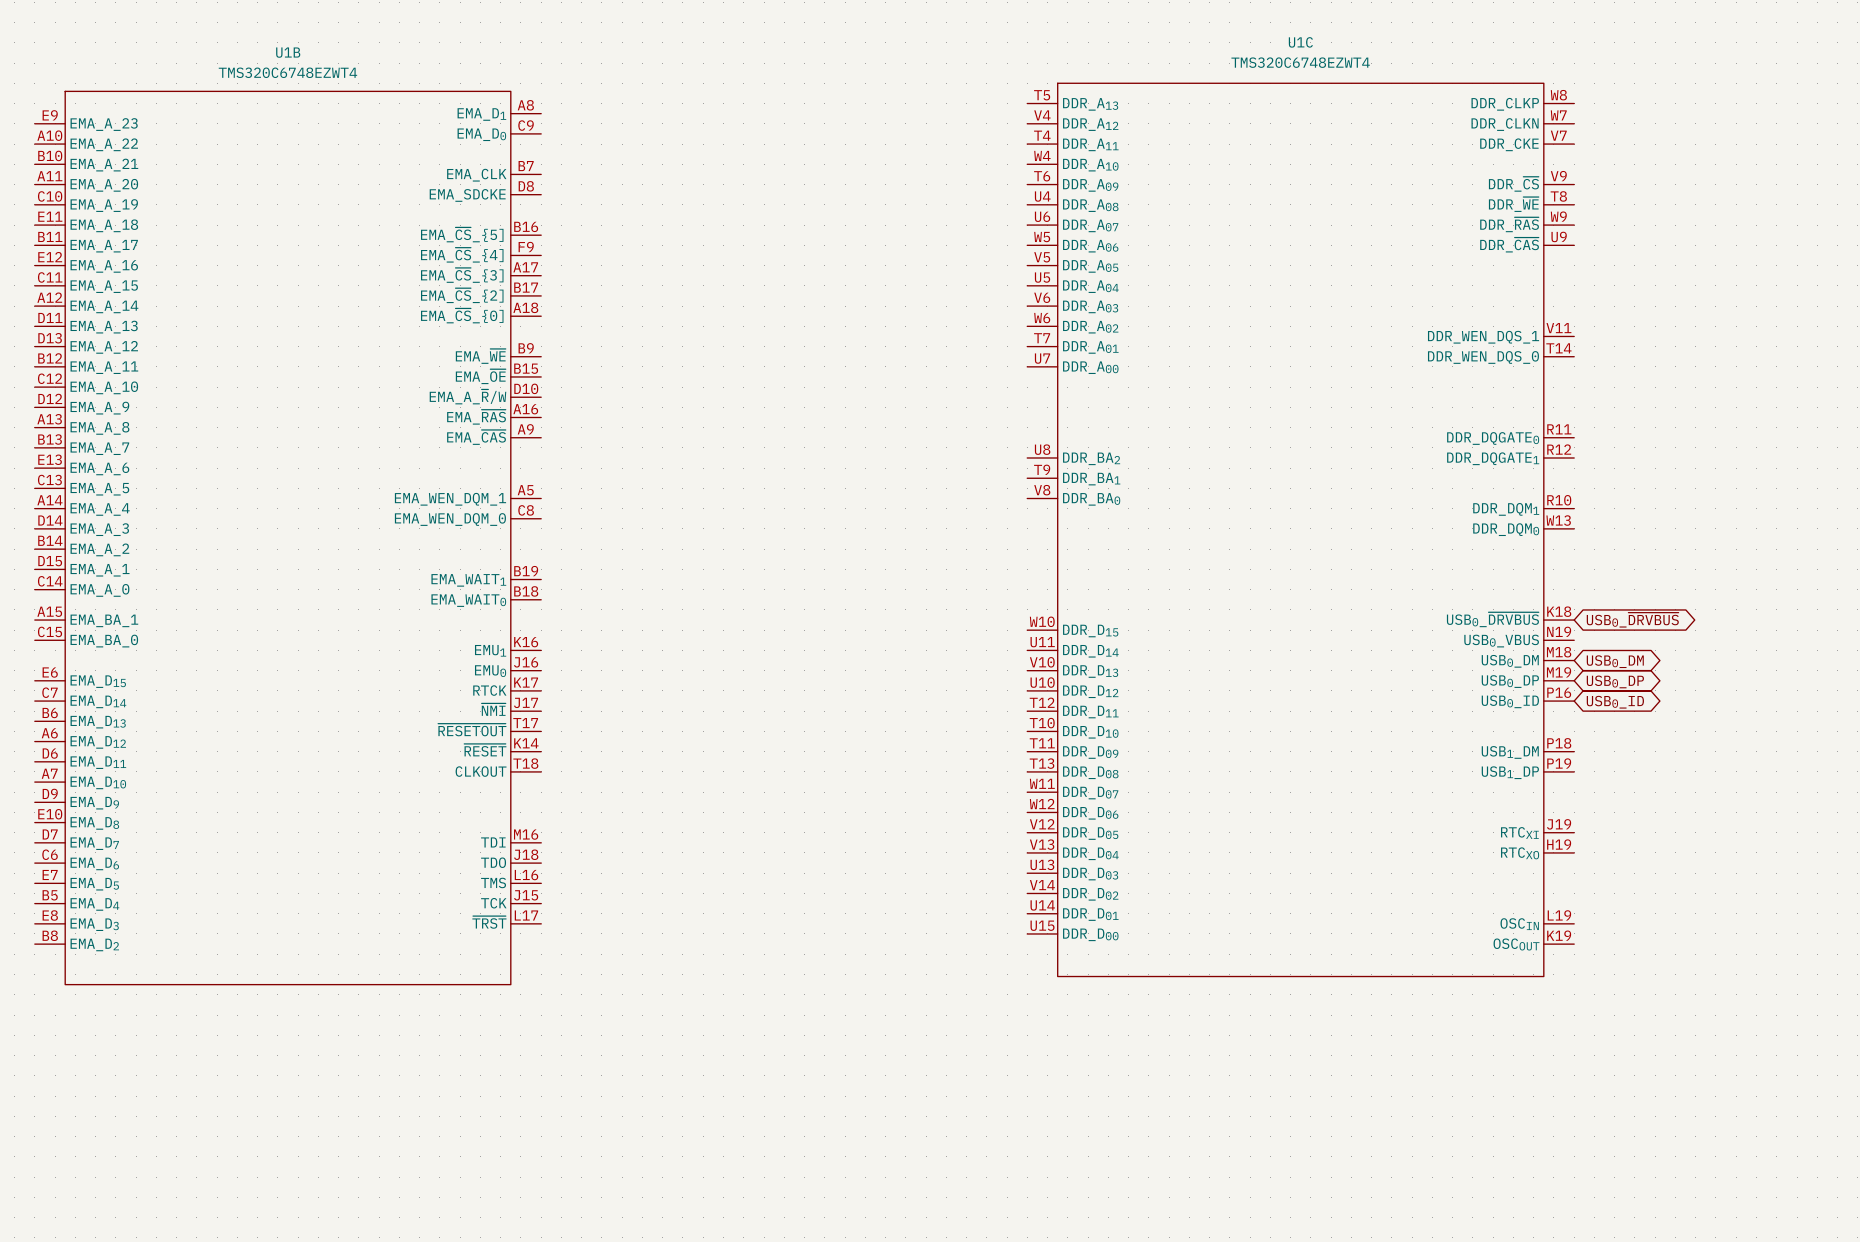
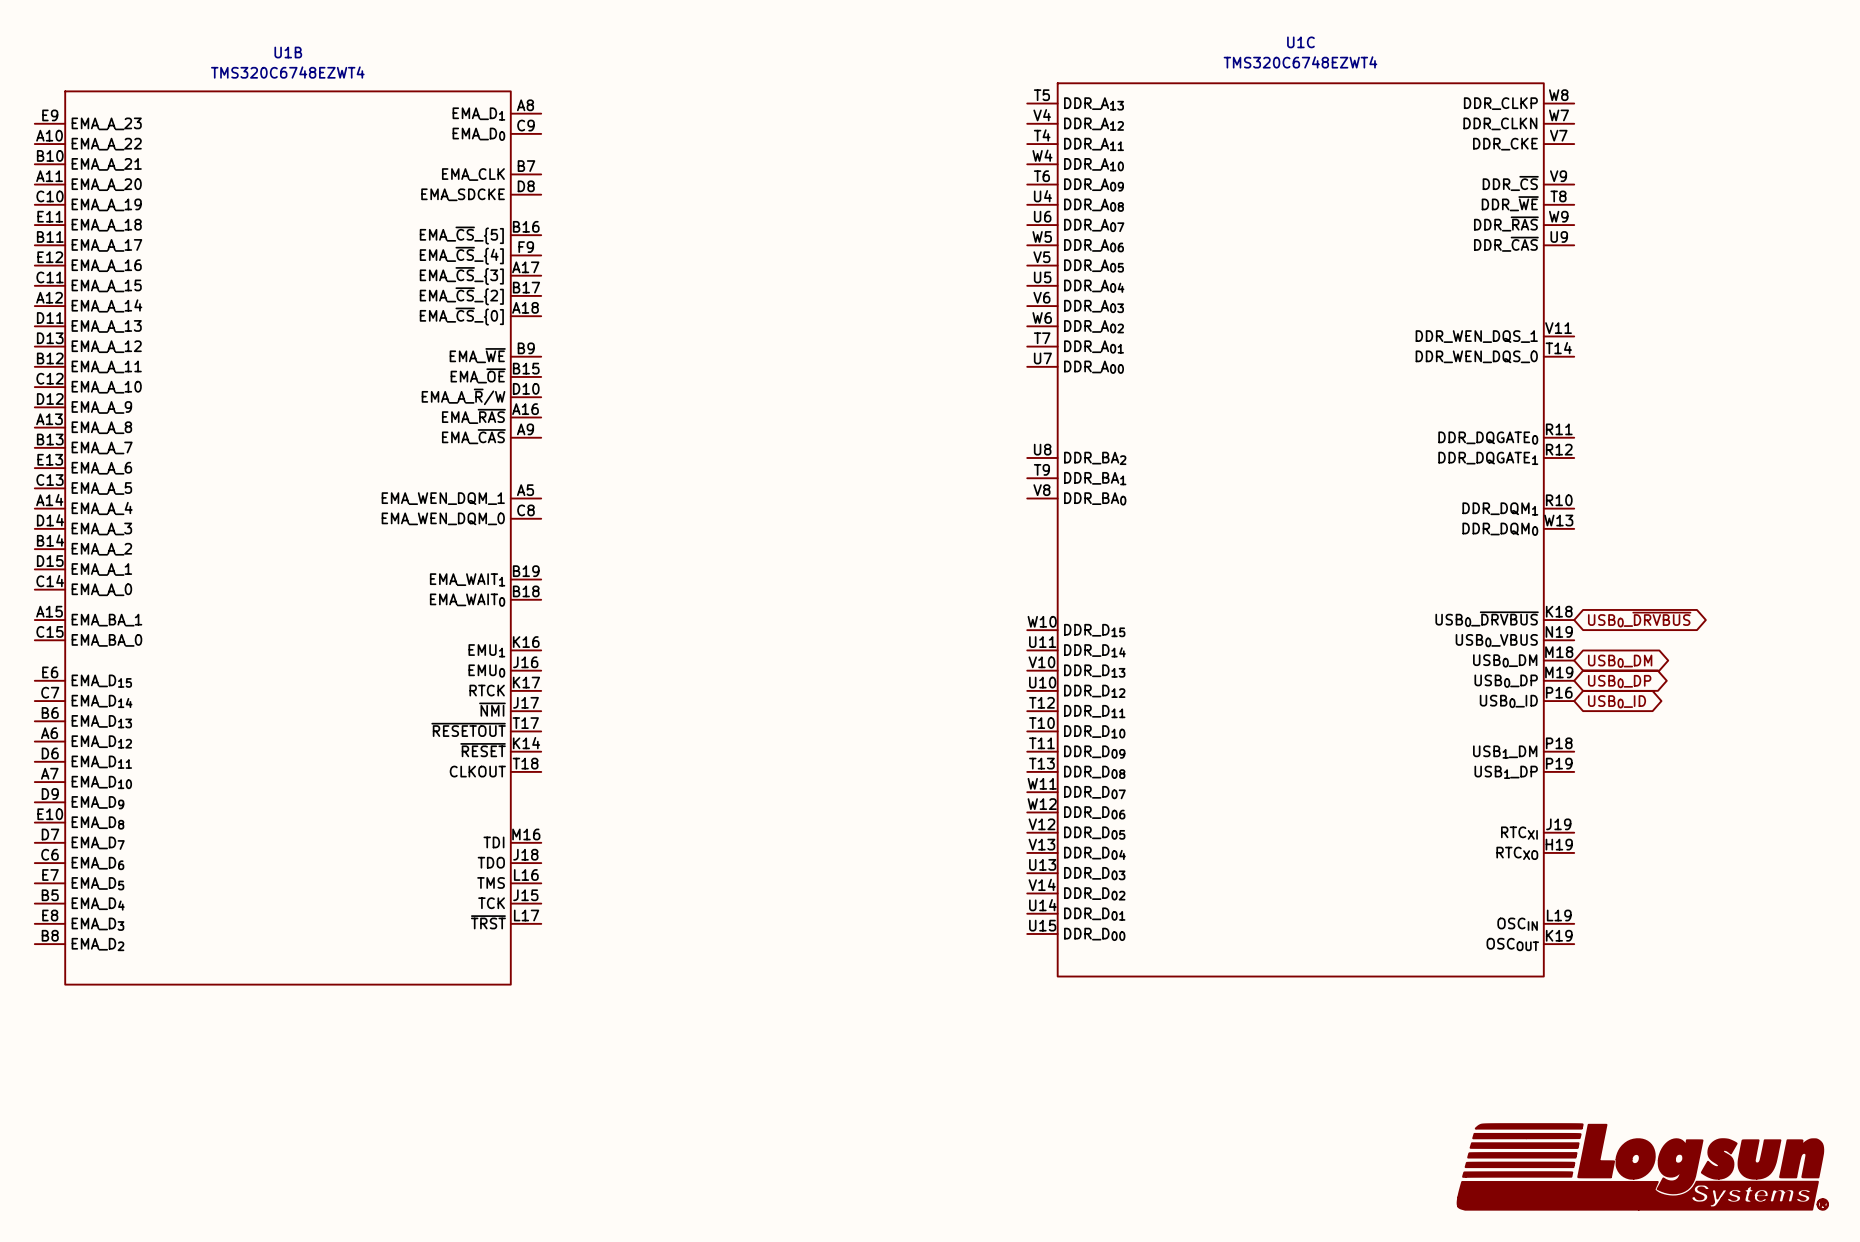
power symbol: none -> (1642, 1166)

